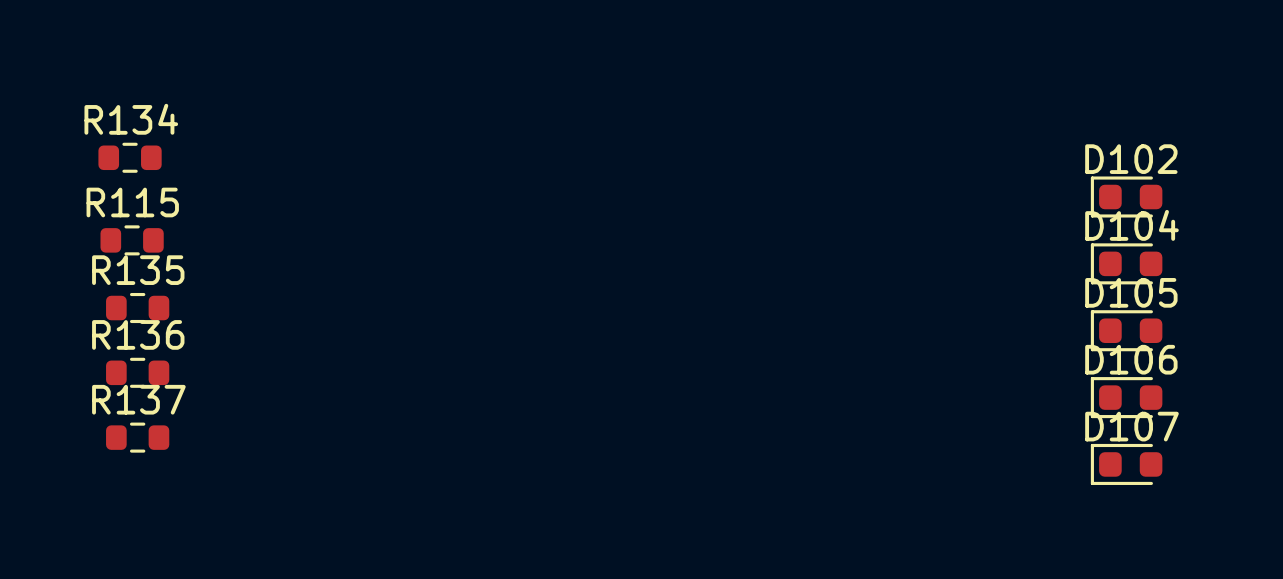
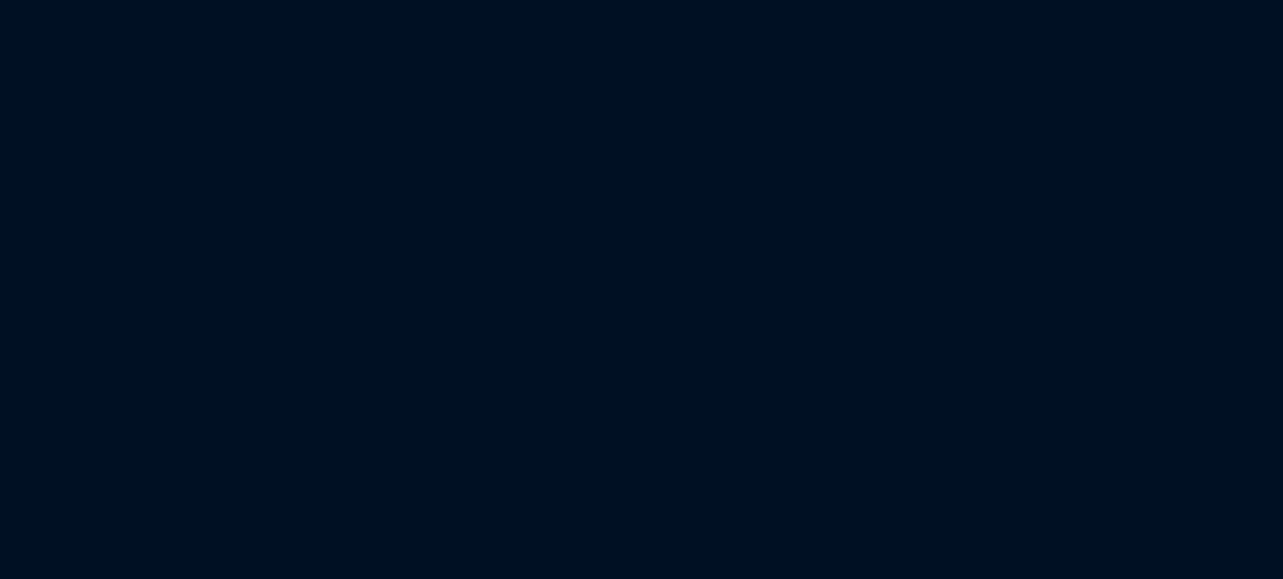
R134: (130, 157) -> none
D102: (1126, 197) -> none
R115: (132, 240) -> none
D104: (1126, 263) -> none
R135: (137, 308) -> none
D105: (1126, 330) -> none
R136: (137, 372) -> none
D106: (1126, 397) -> none
R137: (137, 437) -> none
D107: (1126, 464) -> none

